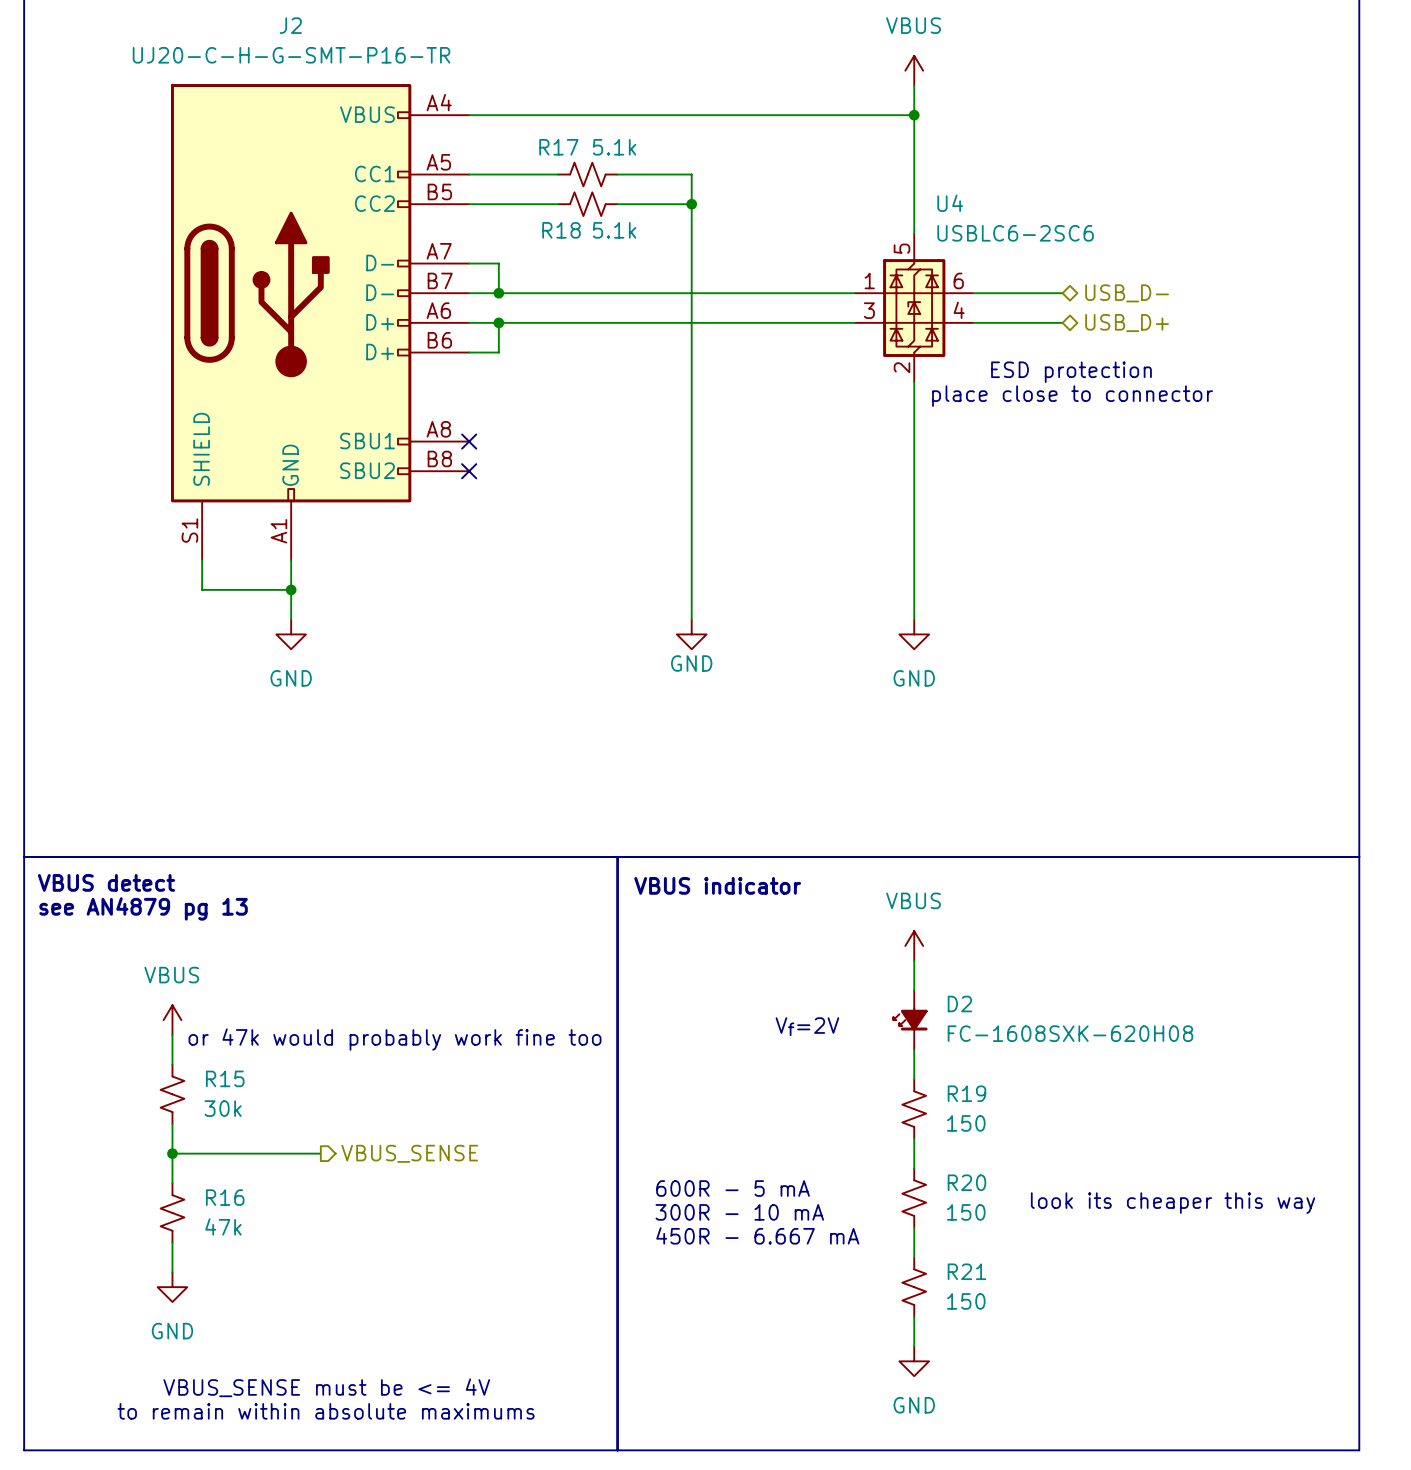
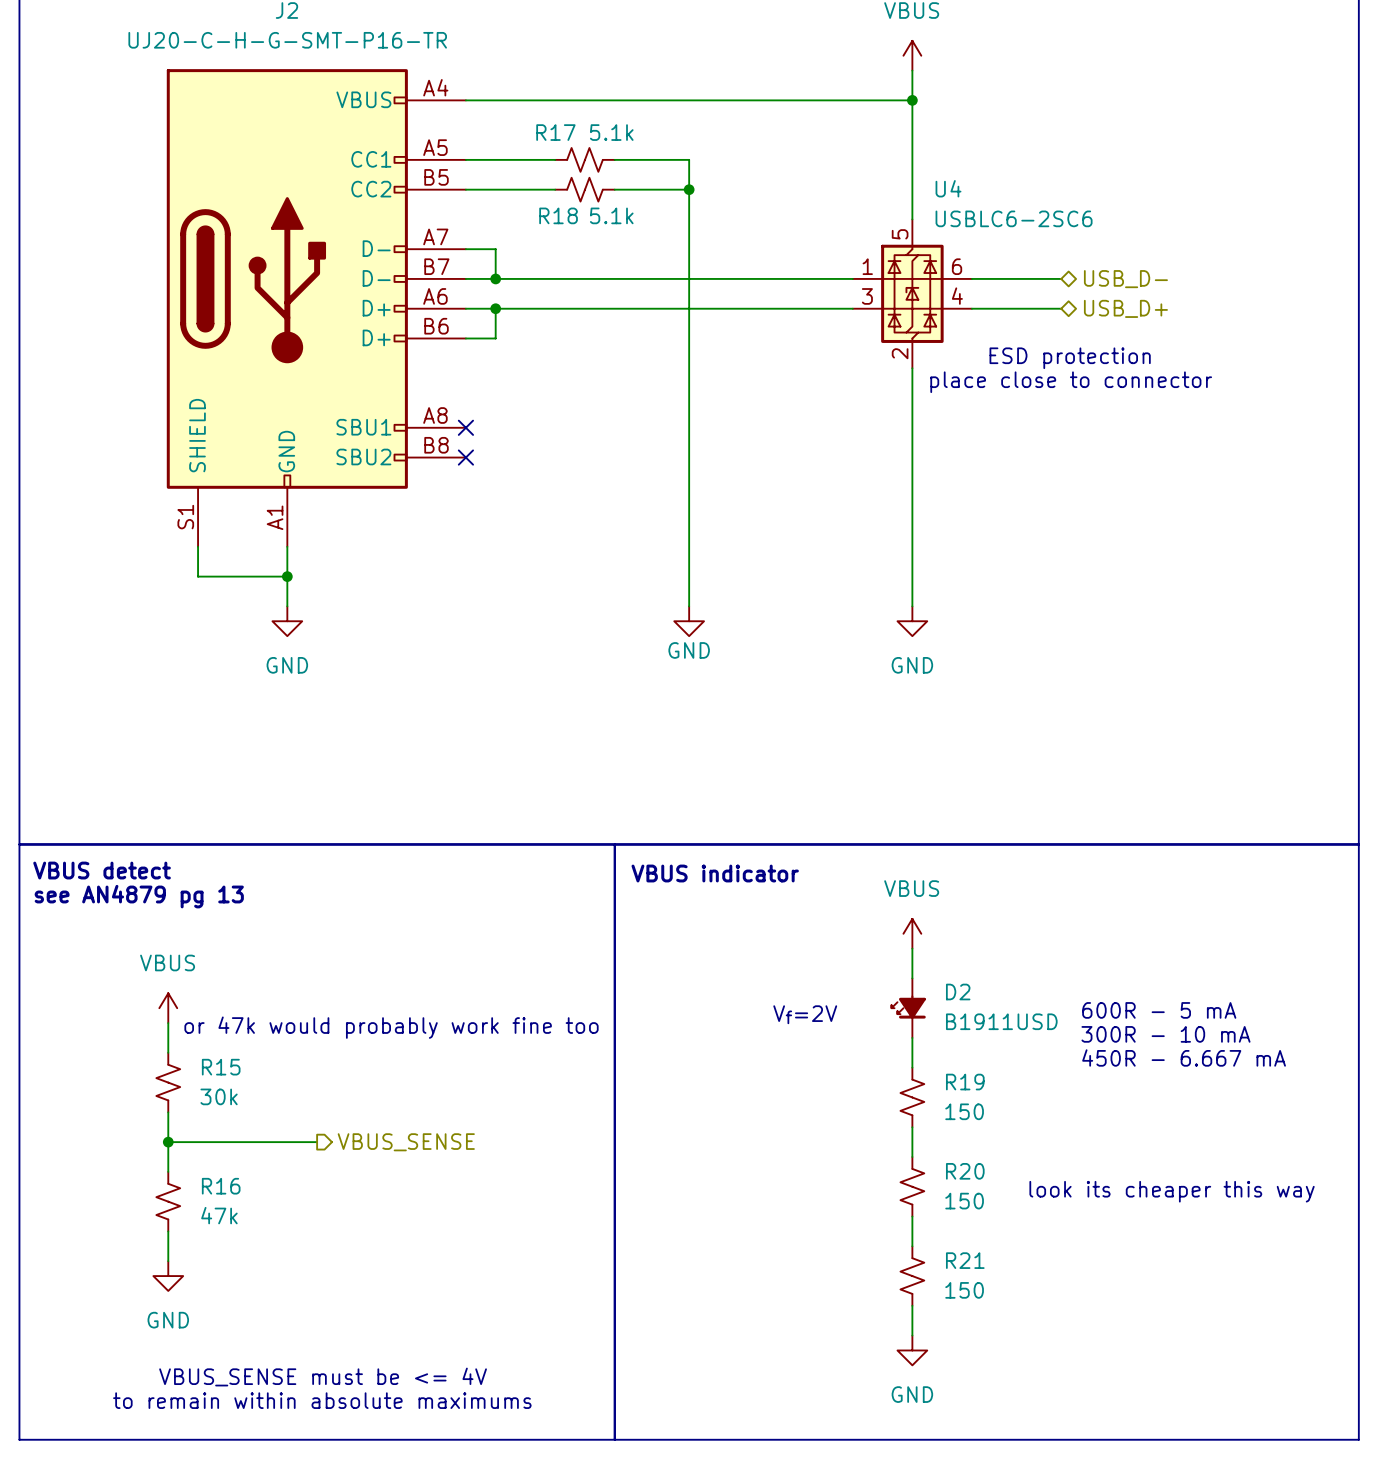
text: none -> 600R - 5 mA (1159, 1010)
D2 value: FC-1608SXK-620H08 (1070, 1033) -> B1911USD (1001, 1021)
text: none -> 300R - 10 mA (1165, 1034)
text: none -> 450R - 6.667 mA (1184, 1057)
text: 600R - 5 mA (733, 1188) -> none
text: 300R - 10 mA (739, 1212) -> none
text: 450R - 6.667 mA (757, 1235) -> none

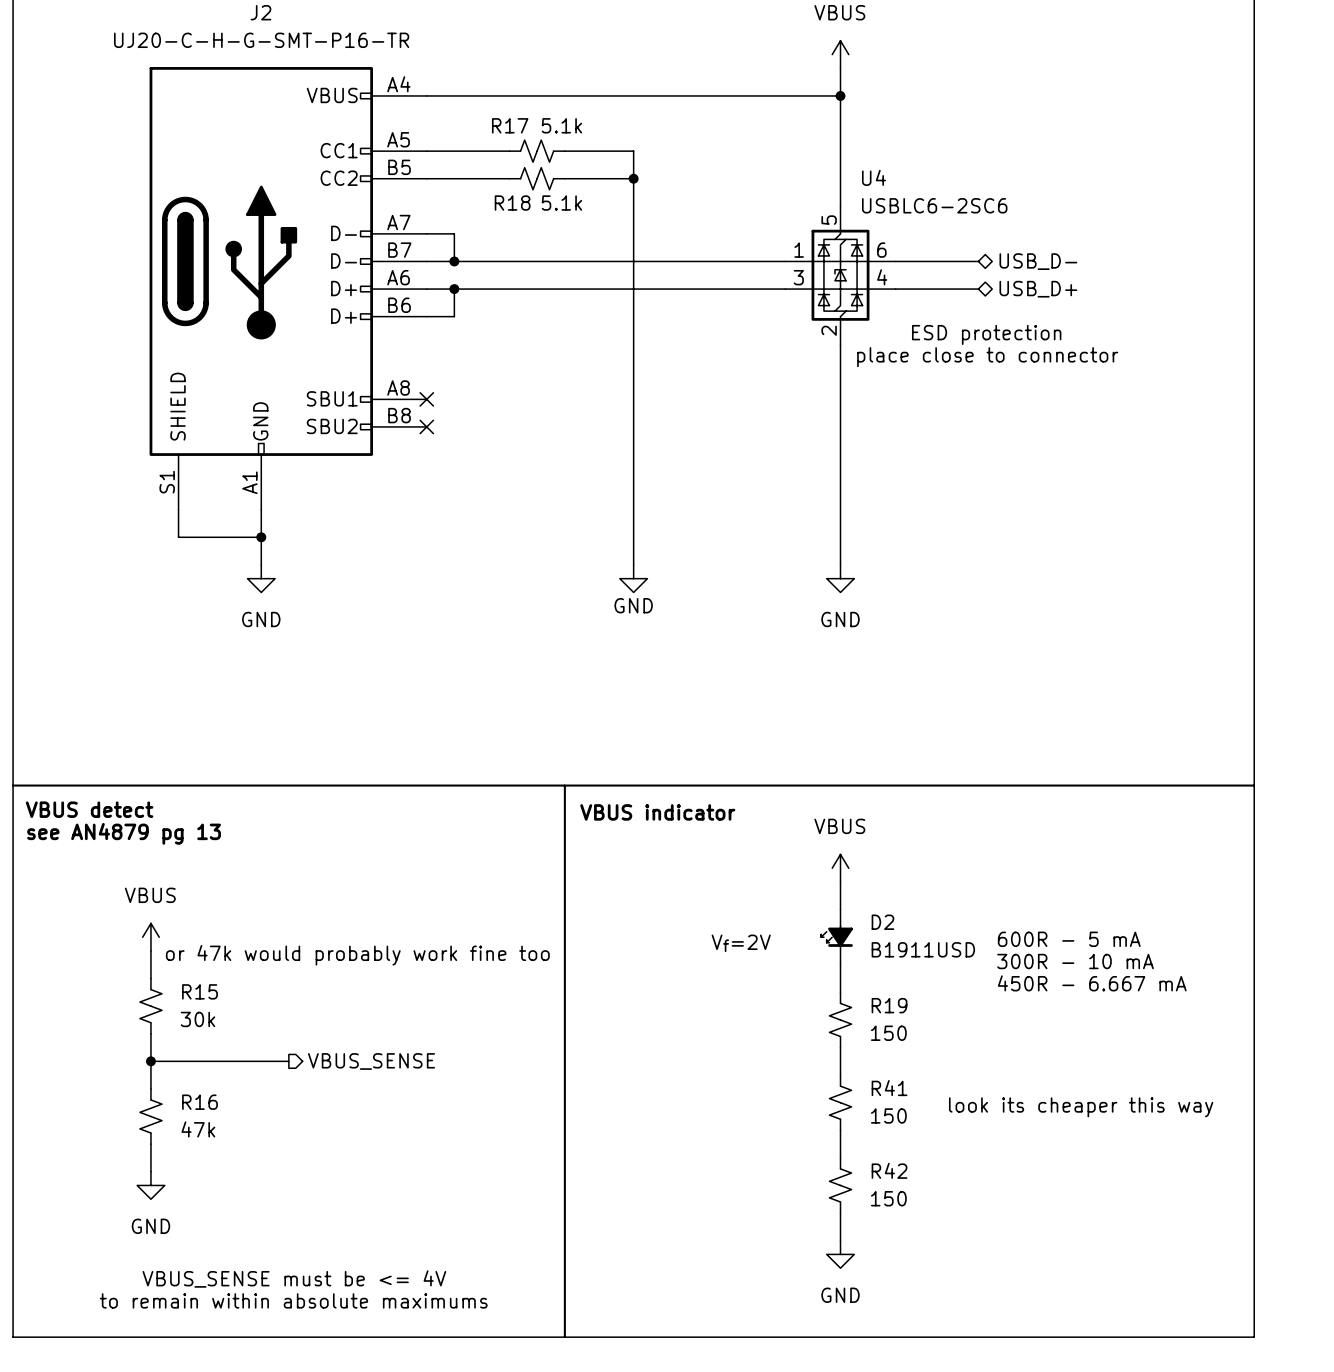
R20 name: R20 (965, 1171) -> R41 (889, 1088)
R21 name: R21 (965, 1260) -> R42 (889, 1170)

